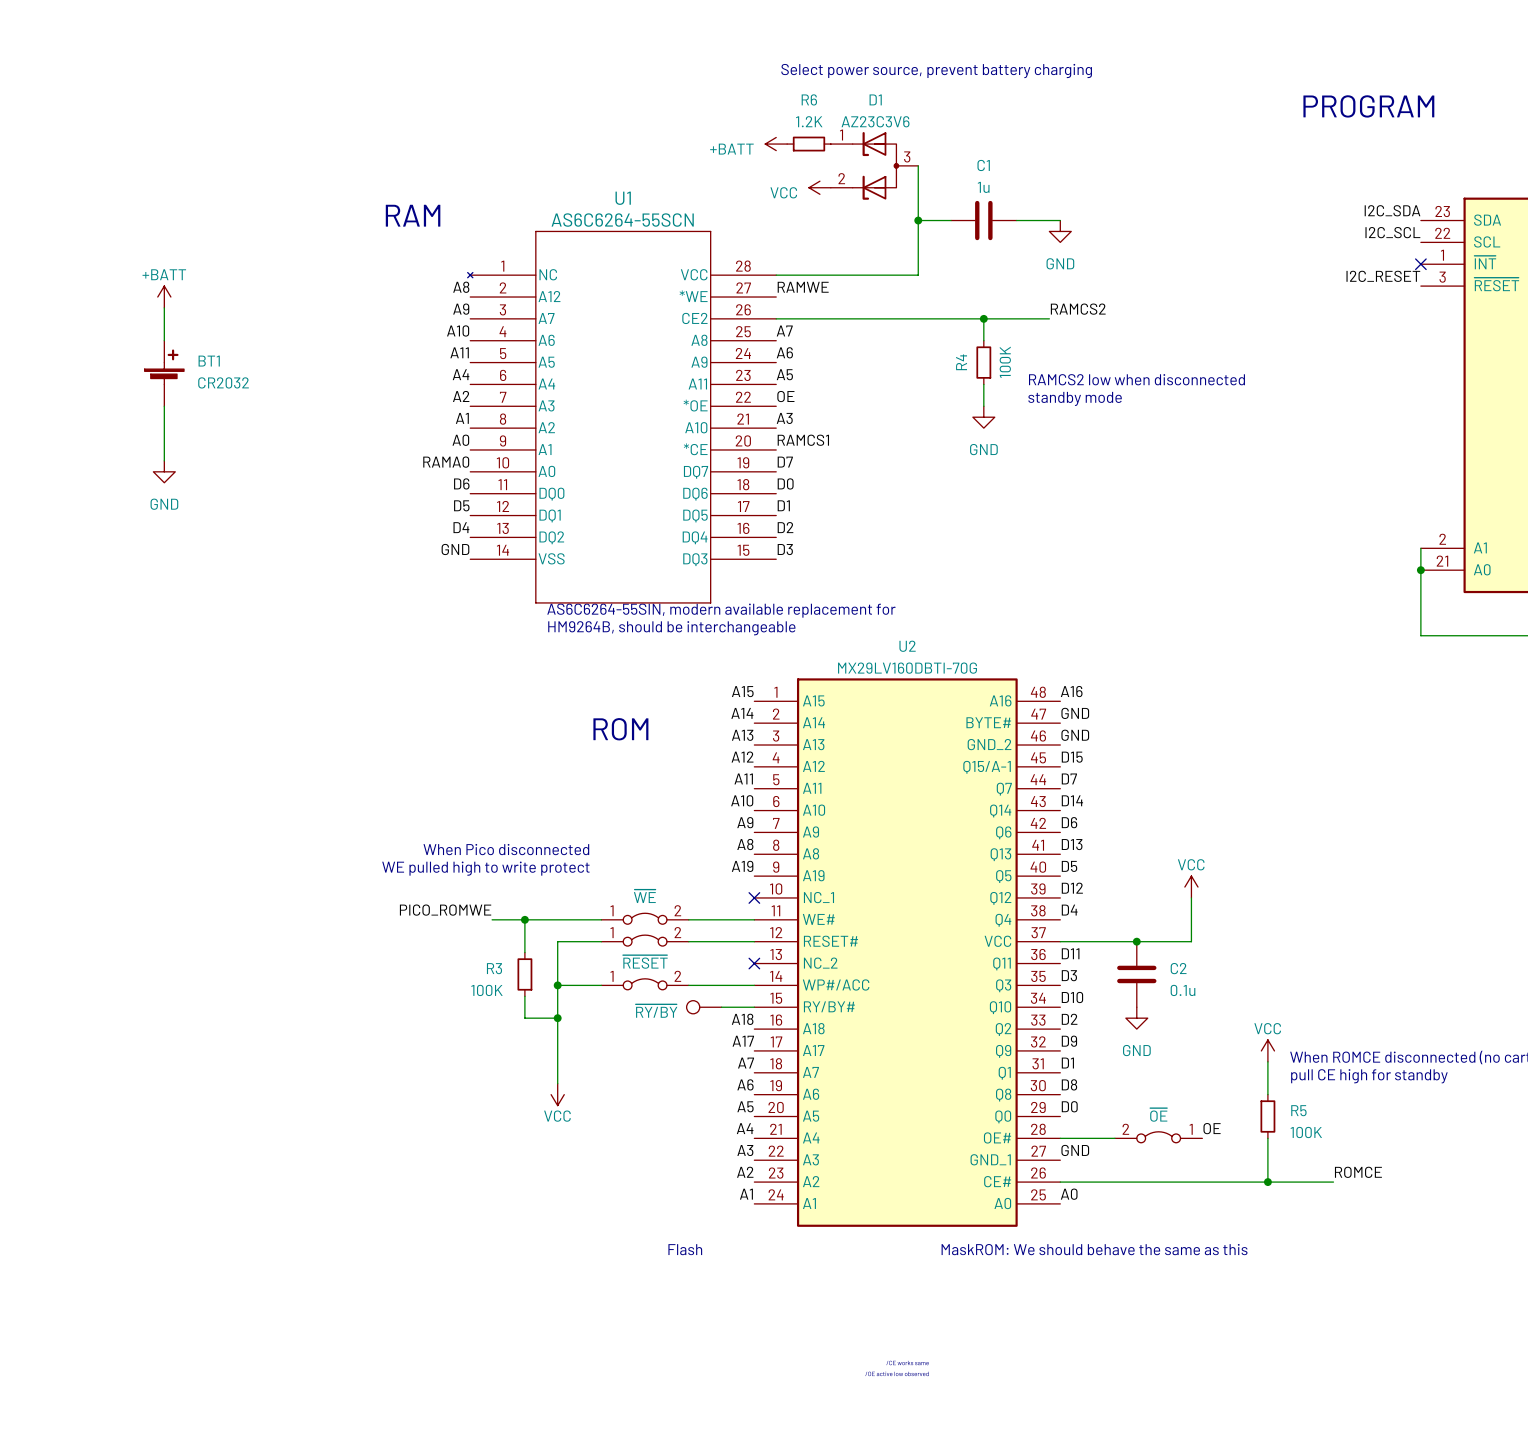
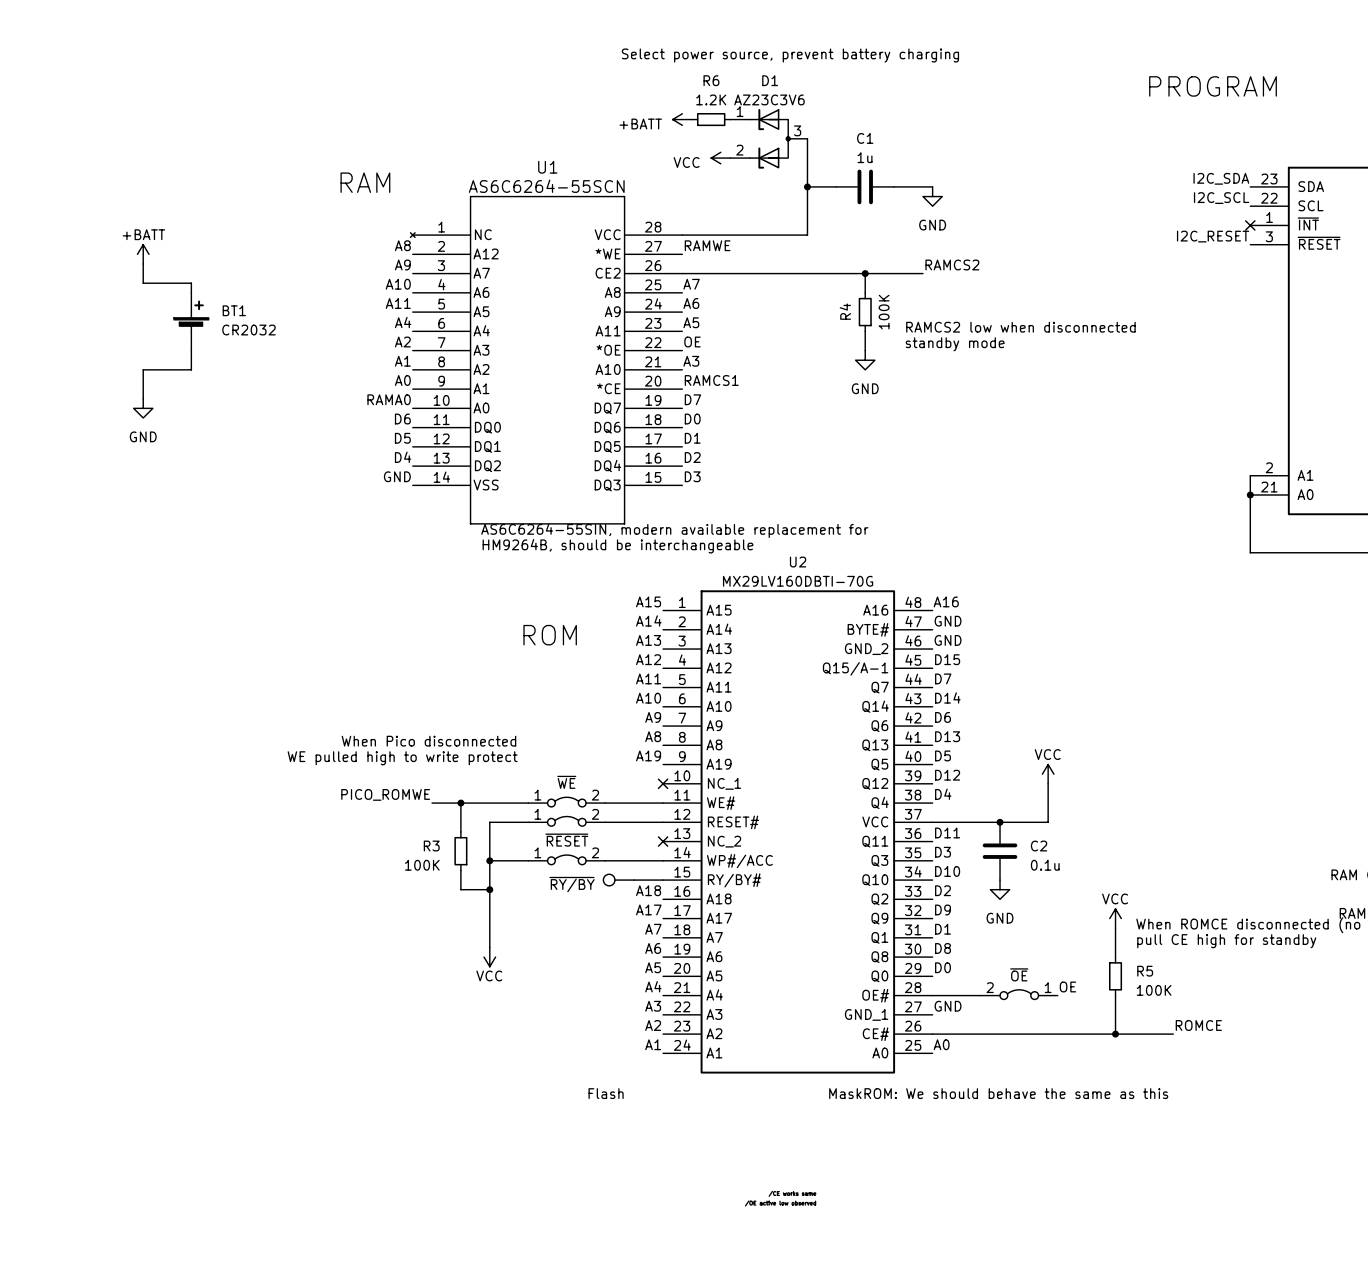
wire: (164, 329) (164, 340) -> (143, 283) (191, 283) (191, 292)
BT1 position: (164, 373) -> (191, 321)
wire: (164, 406) (164, 428) -> (191, 350) (191, 369) (143, 369)

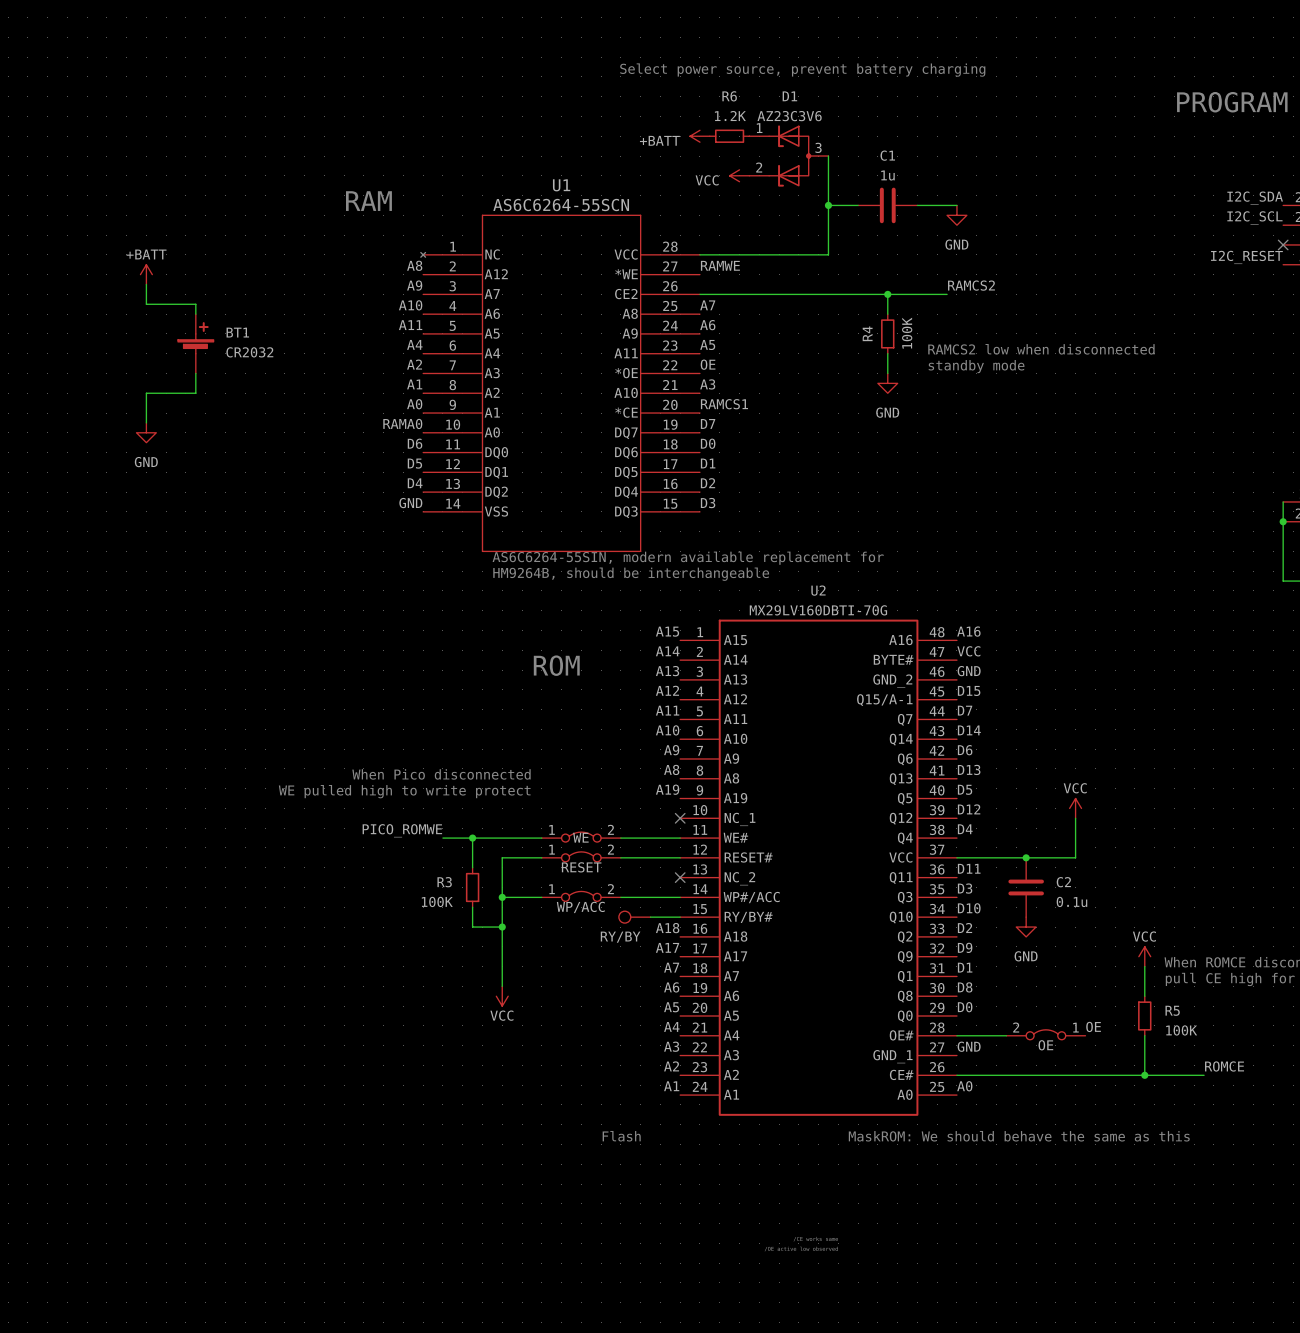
label: GND (948, 621) -> VCC (968, 651)
part value: ~{WE} (566, 782) -> WE (580, 837)
part value: none -> RESET (581, 867)
part value: ~{RESET} (566, 840) -> WP/ACC (580, 907)
part value: ~{RY/BY} (572, 884) -> RY/BY (620, 937)
part value: ~{OE} (1019, 974) -> OE (1045, 1045)

